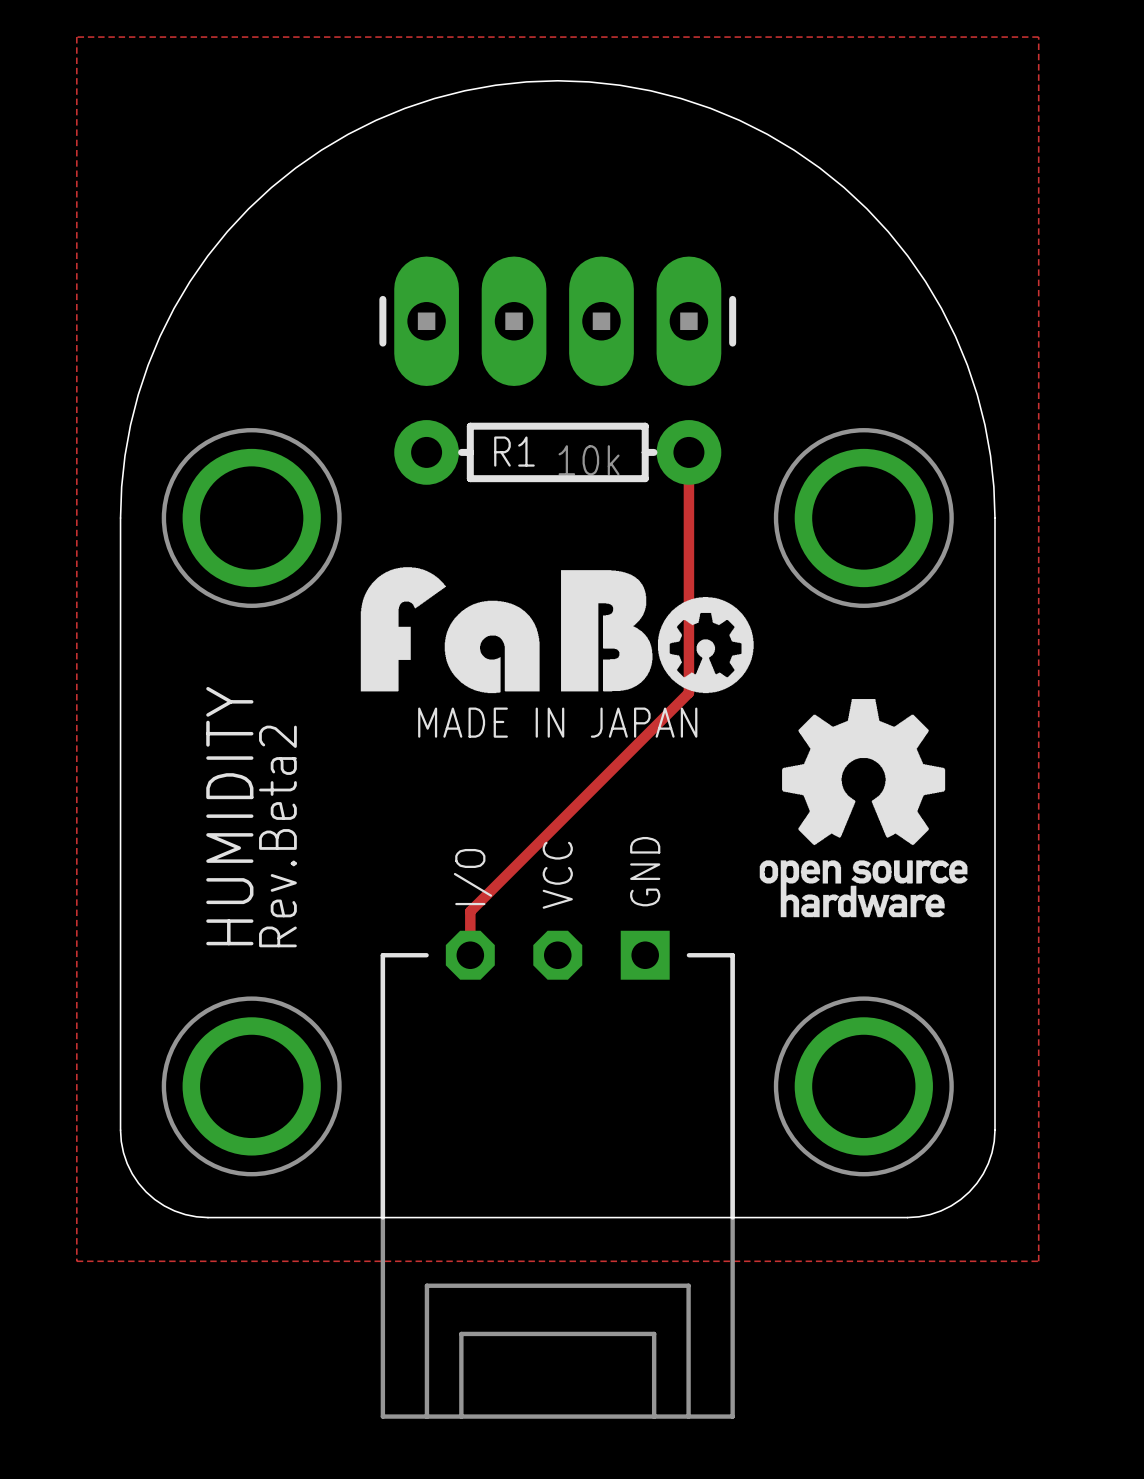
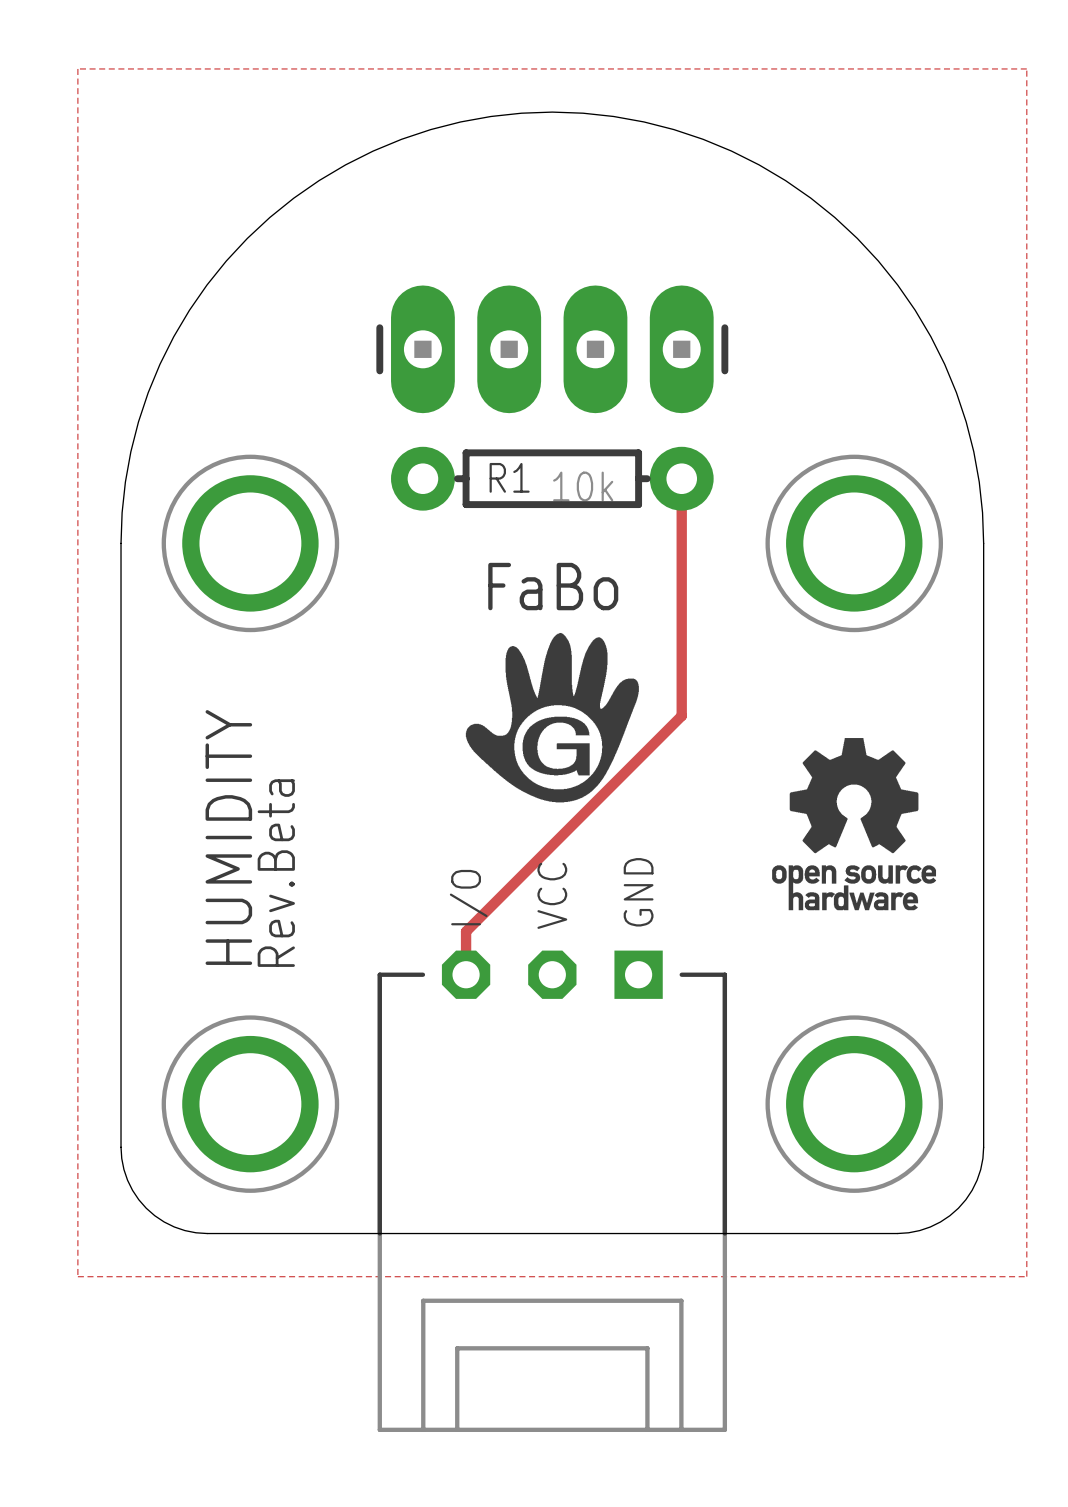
drawing: [360, 567, 754, 694] -> none
drawing: none -> [465, 632, 639, 803]
drawing shape: [759, 699, 968, 918] -> [772, 738, 937, 911]
text: MADE IN JAPAN (557, 722) -> none
text: Rev.Beta2 (277, 836) -> Rev.Beta (276, 873)

